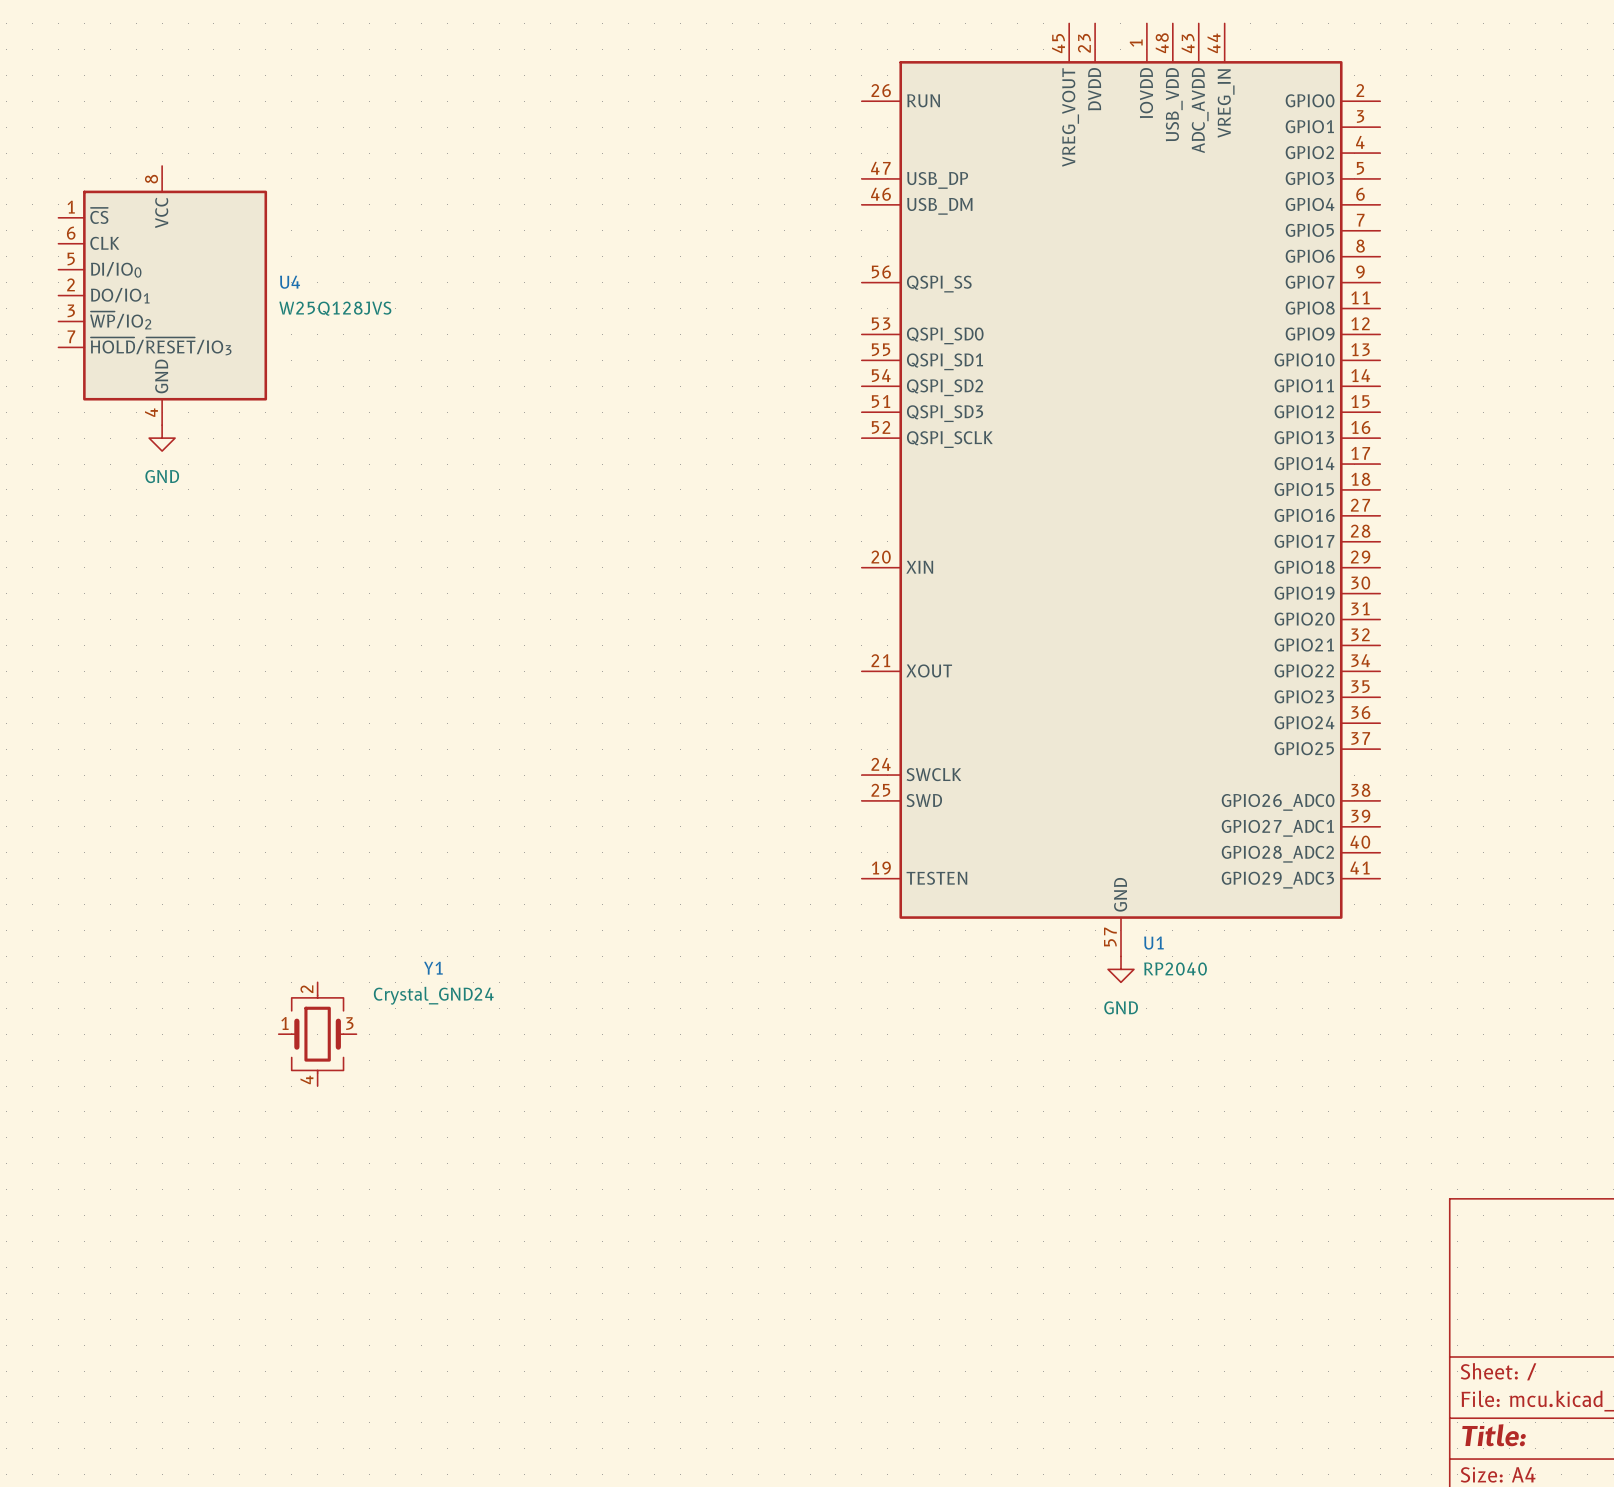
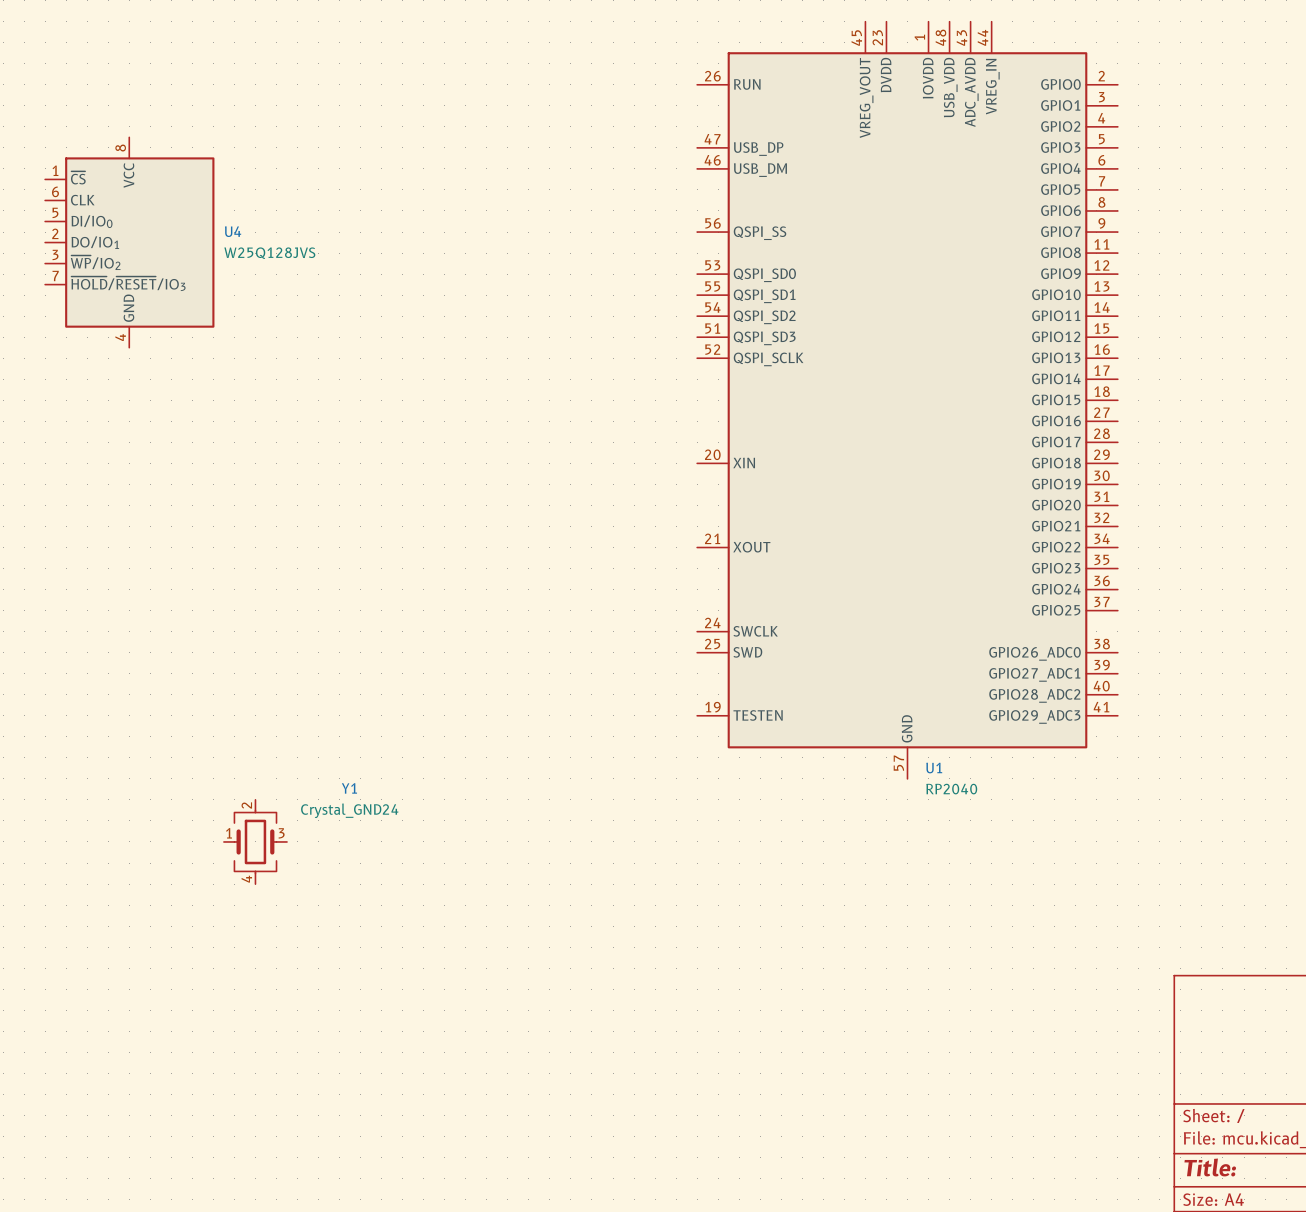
power symbol: GND (162, 438) -> none
power symbol: GND (1120, 969) -> none

